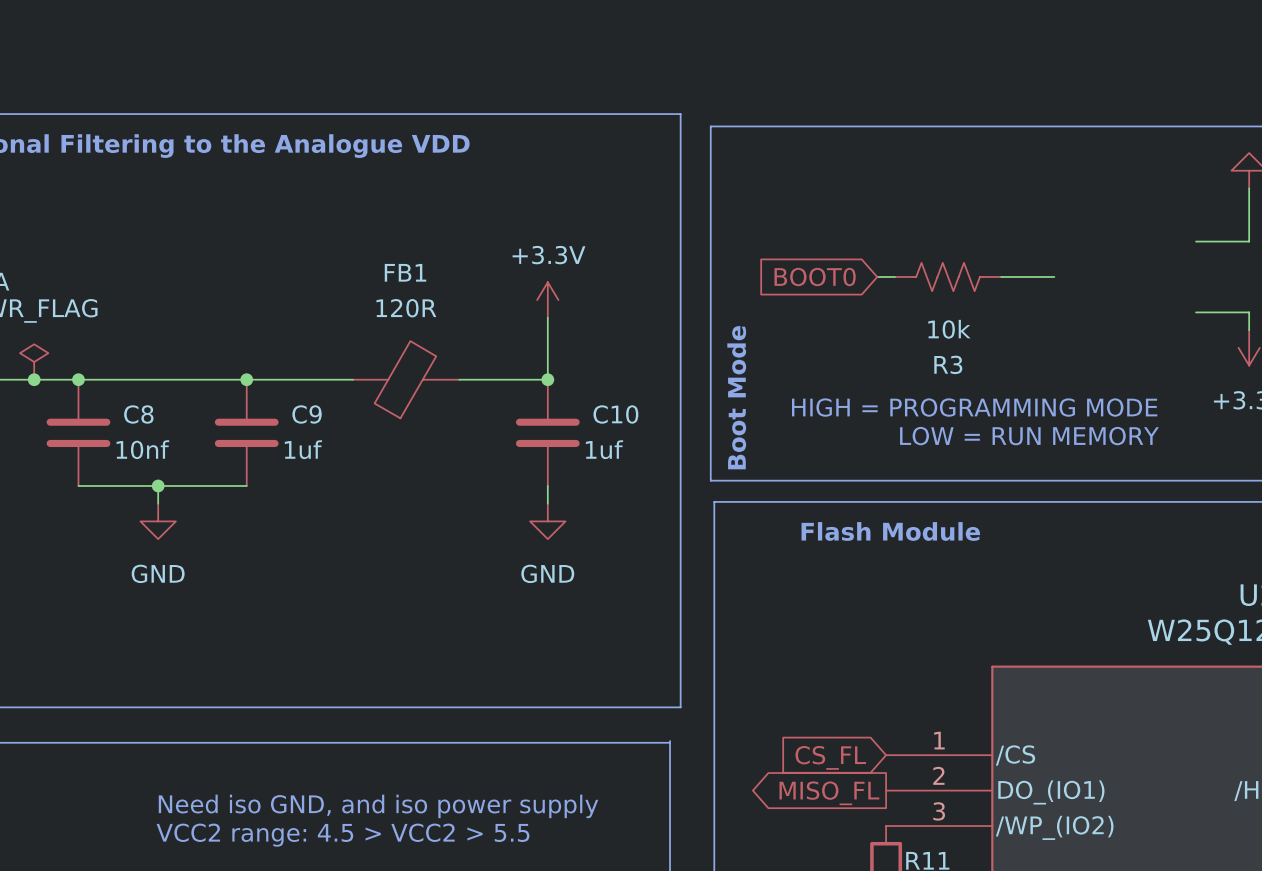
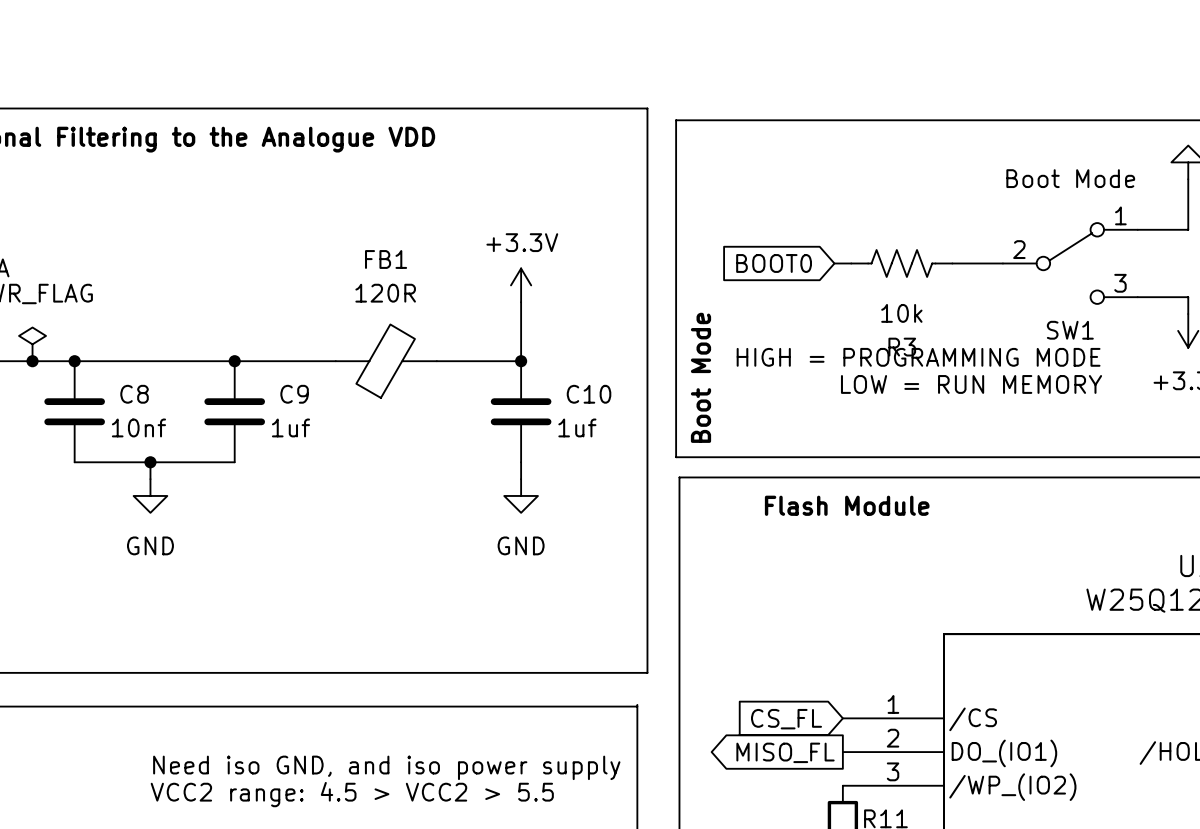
SW1: none -> Boot Mode (1070, 263)
text: none -> HIGH = PROGRAMMING MODE (918, 357)
text: HIGH = PROGRAMMING MODE (974, 407) -> LOW = RUN MEMORY (971, 384)
text: LOW = RUN MEMORY (1029, 436) -> none

